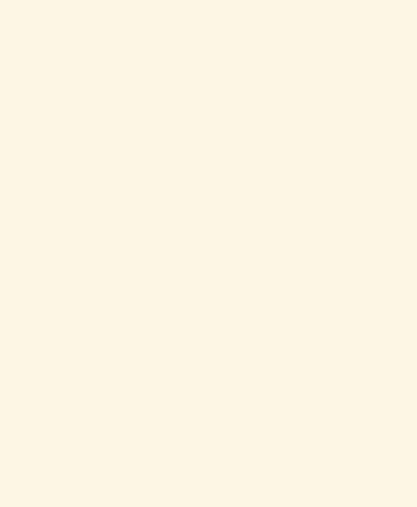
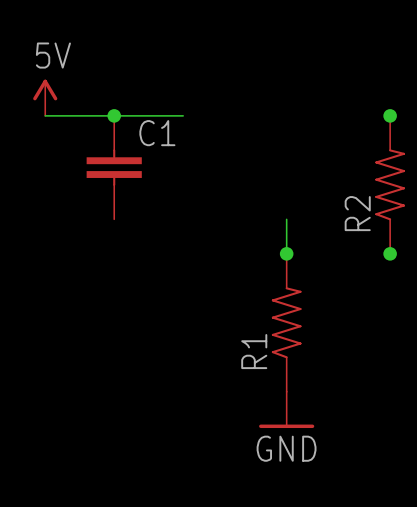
power symbol: none -> 5V (45, 97)
wire: none -> (45, 115) (183, 115)
junction: none -> (114, 115)
junction: none -> (390, 115)
C1: none -> (114, 167)
R2: none -> (390, 184)
wire: none -> (286, 219) (286, 253)
junction: none -> (286, 253)
junction: none -> (390, 253)
R1: none -> (286, 322)
power symbol: none -> GND (286, 409)

